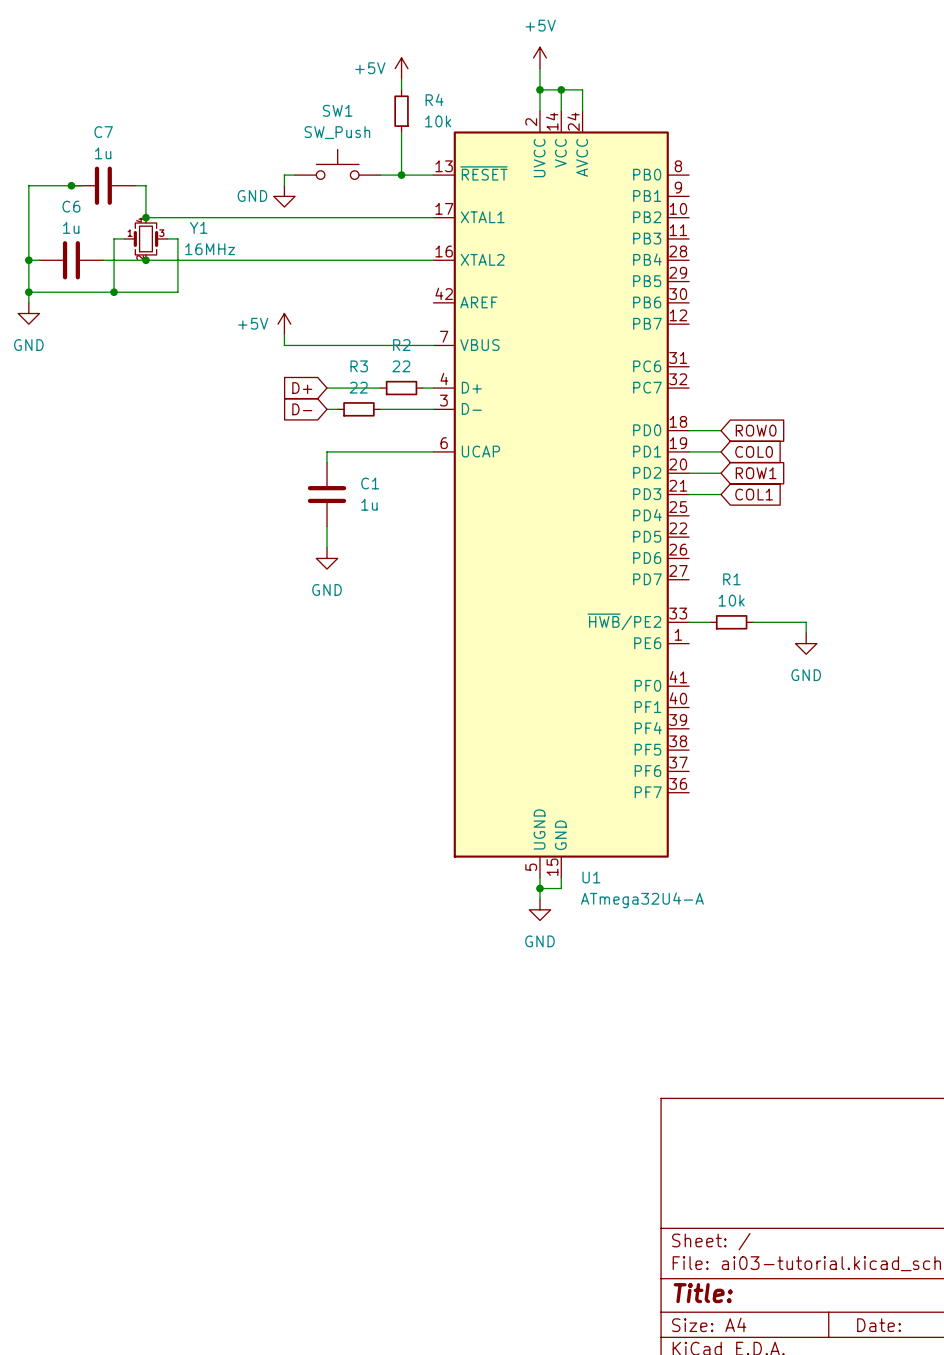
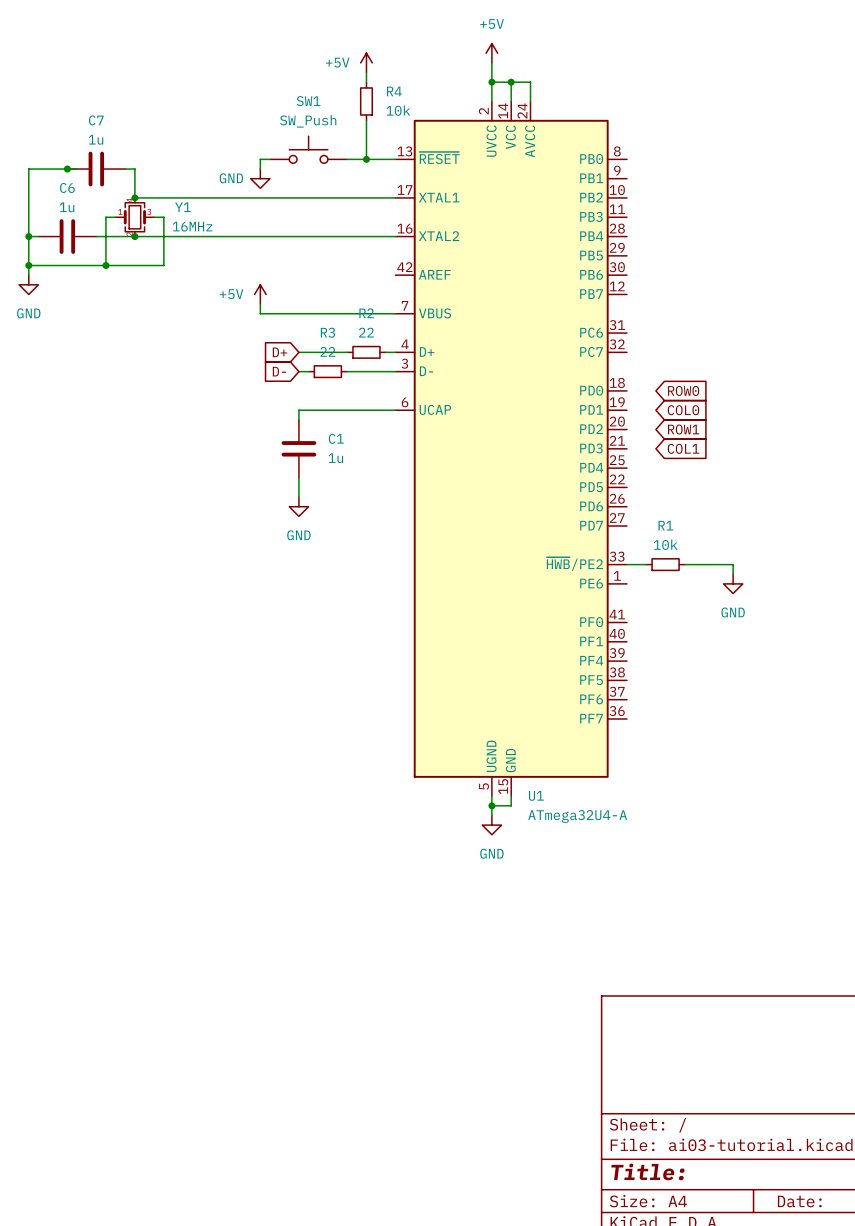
wire: (689, 430) (721, 430) -> none
wire: (689, 451) (721, 451) -> none
wire: (689, 473) (721, 473) -> none
wire: (689, 494) (721, 494) -> none

